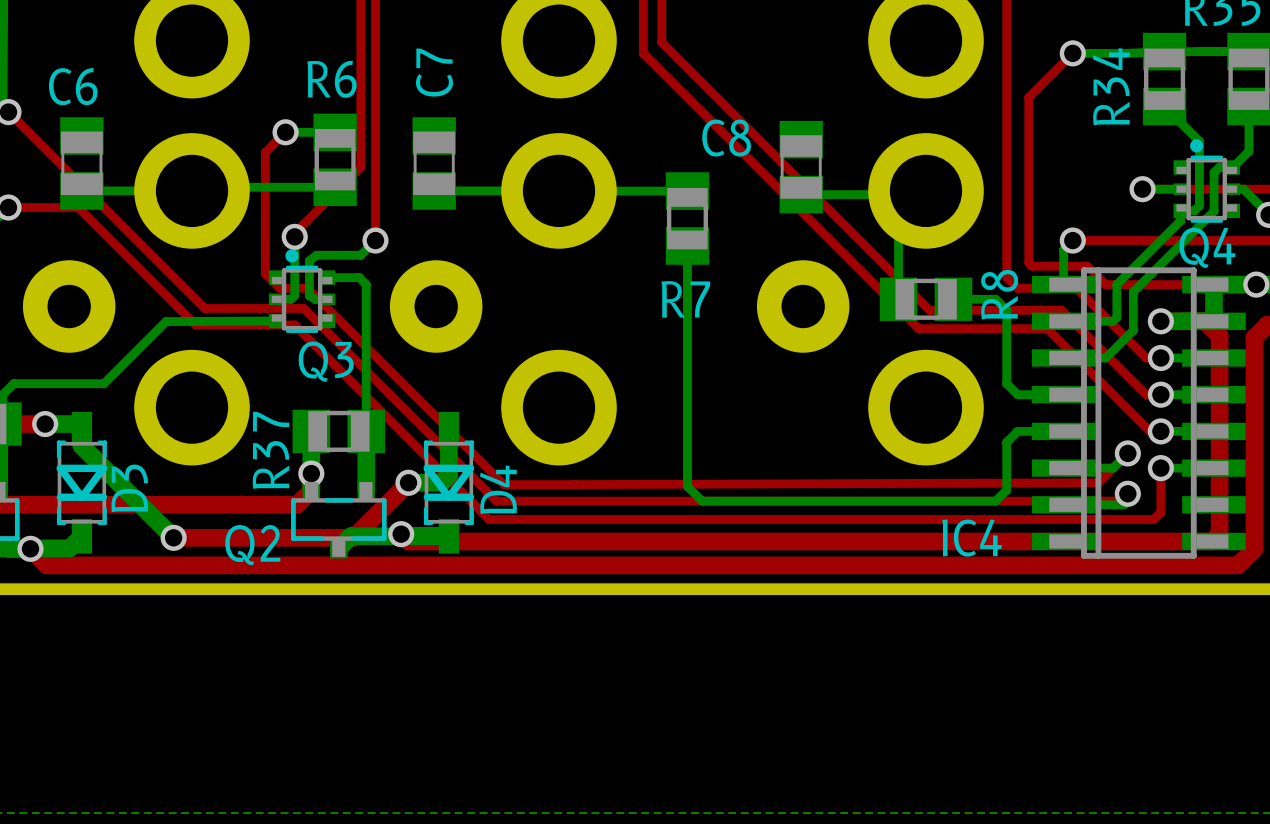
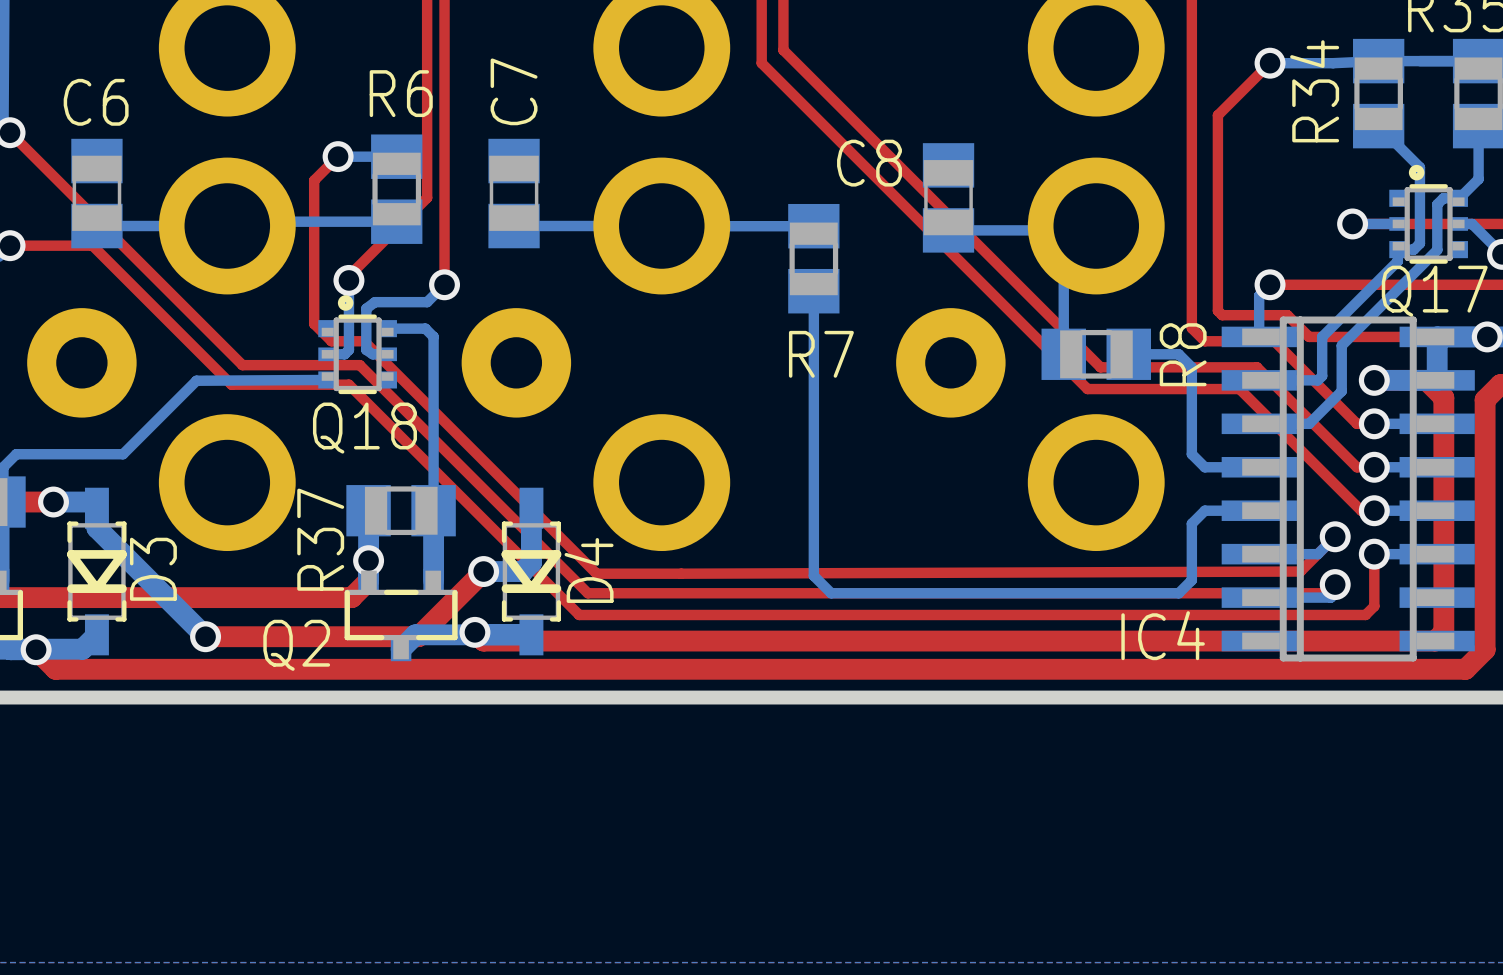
Q4 name: Q4 (1207, 247) -> Q17 (1434, 291)
Q3 name: Q3 (326, 361) -> Q18 (364, 428)

